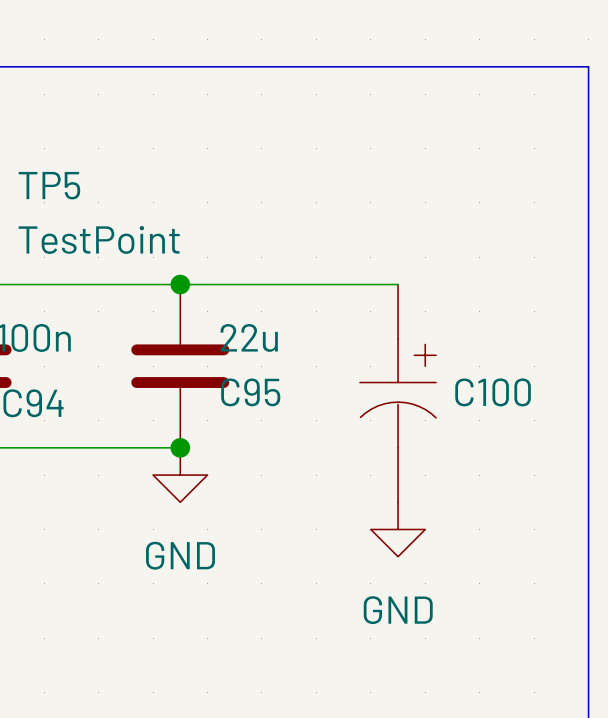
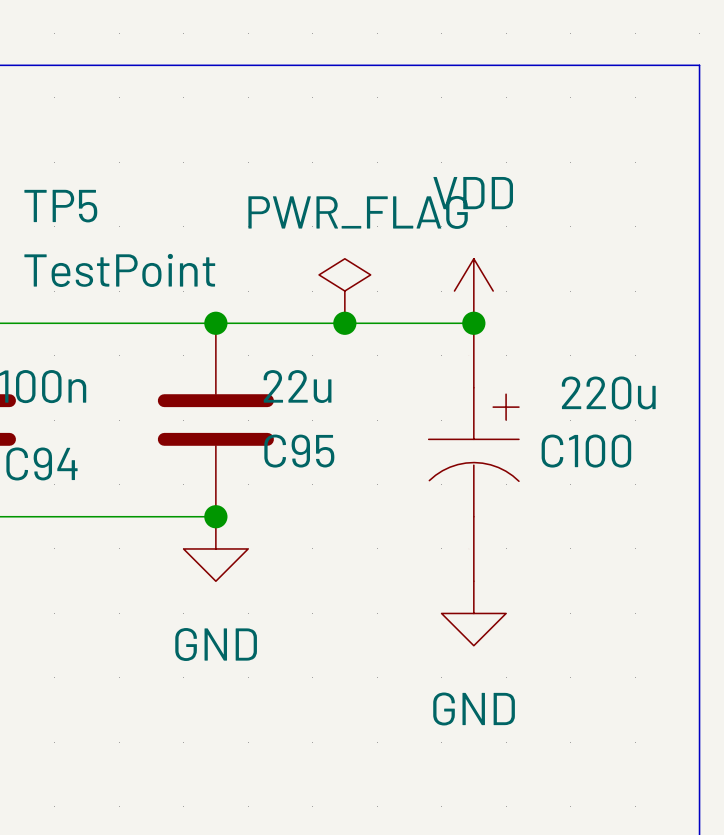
power symbol: none -> PWR_FLAG (344, 291)
power symbol: none -> VDD (473, 291)
junction: none -> (344, 323)
junction: none -> (473, 323)
C100 value: none -> 220u (608, 393)

